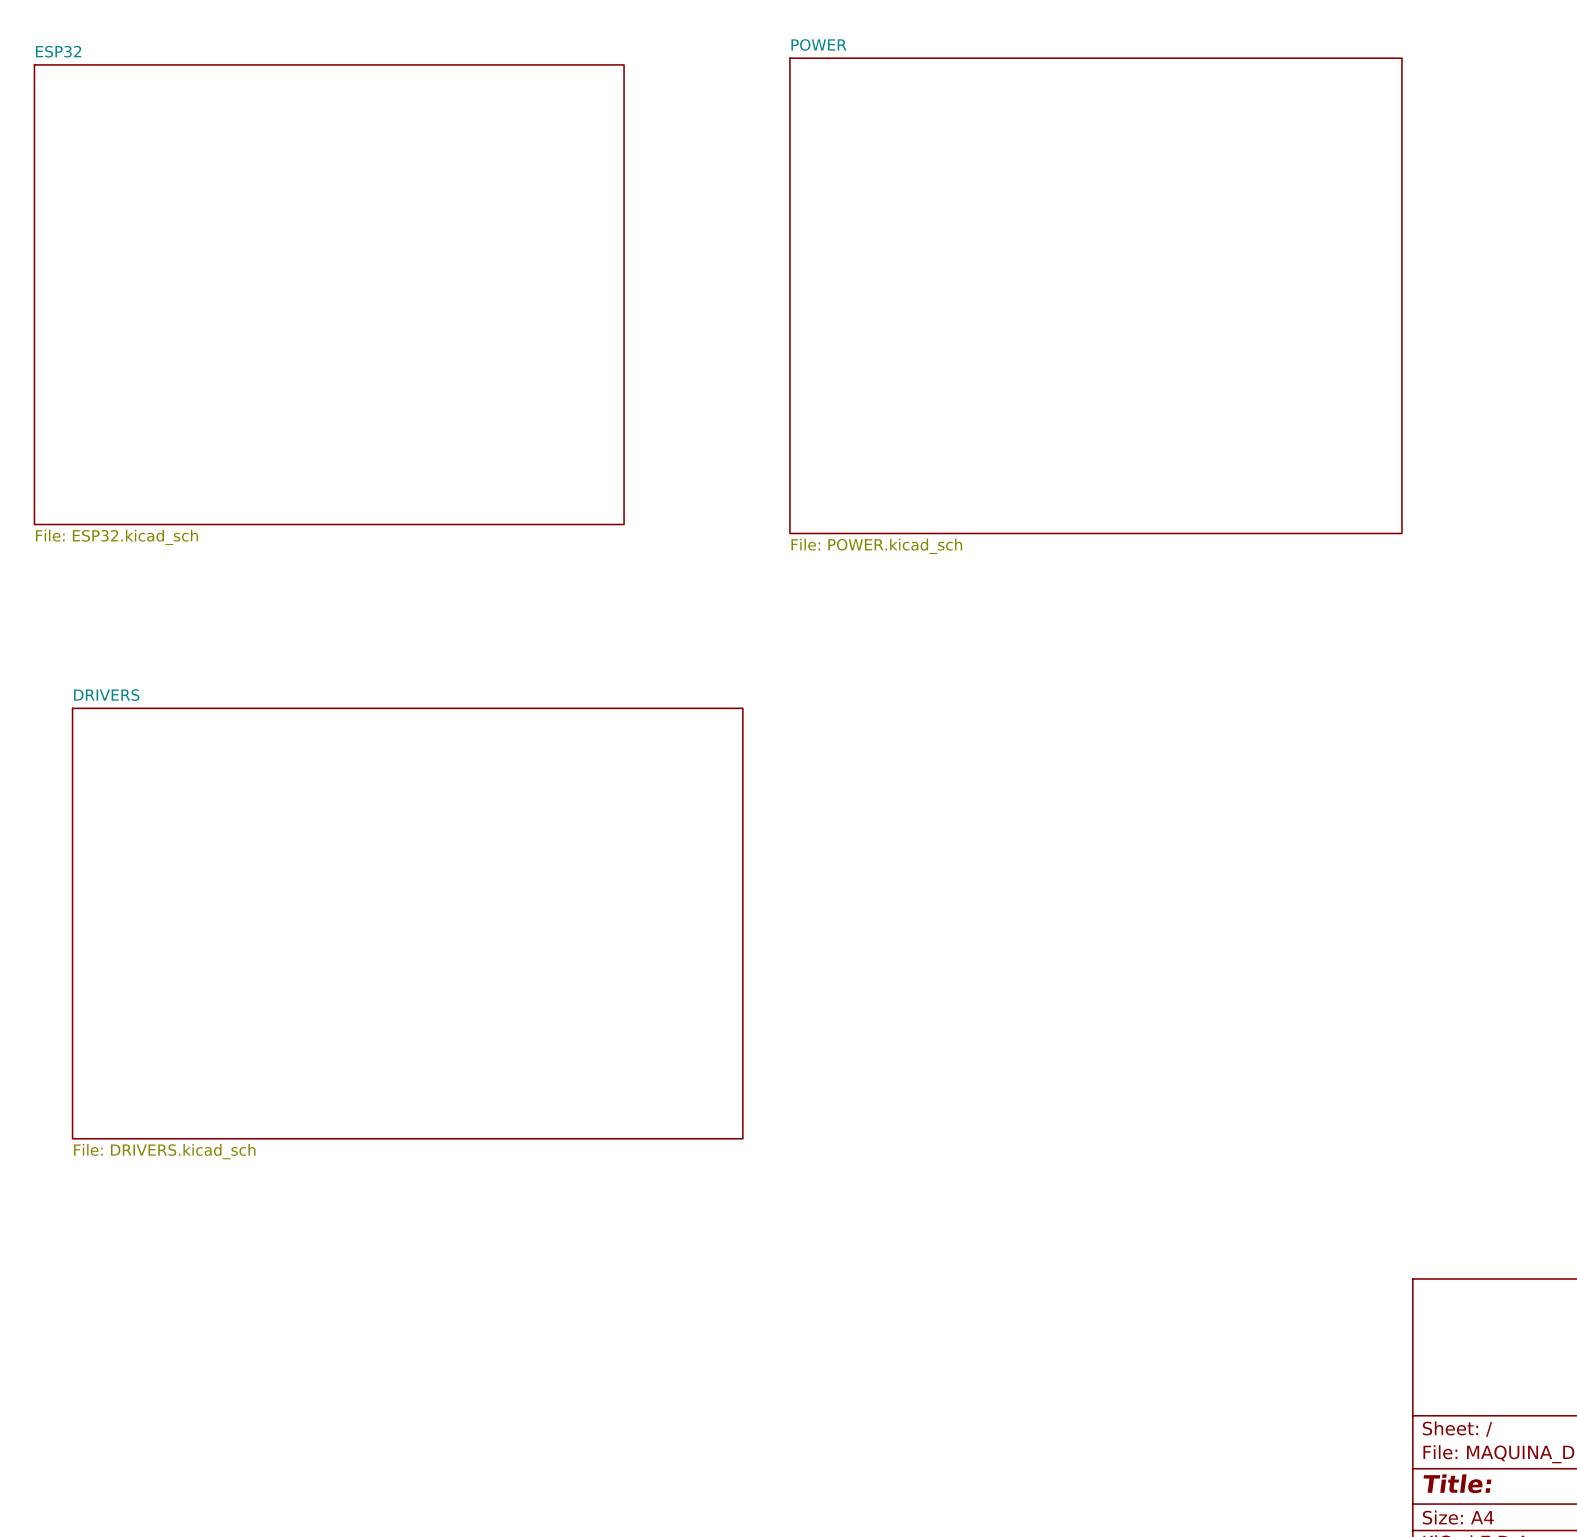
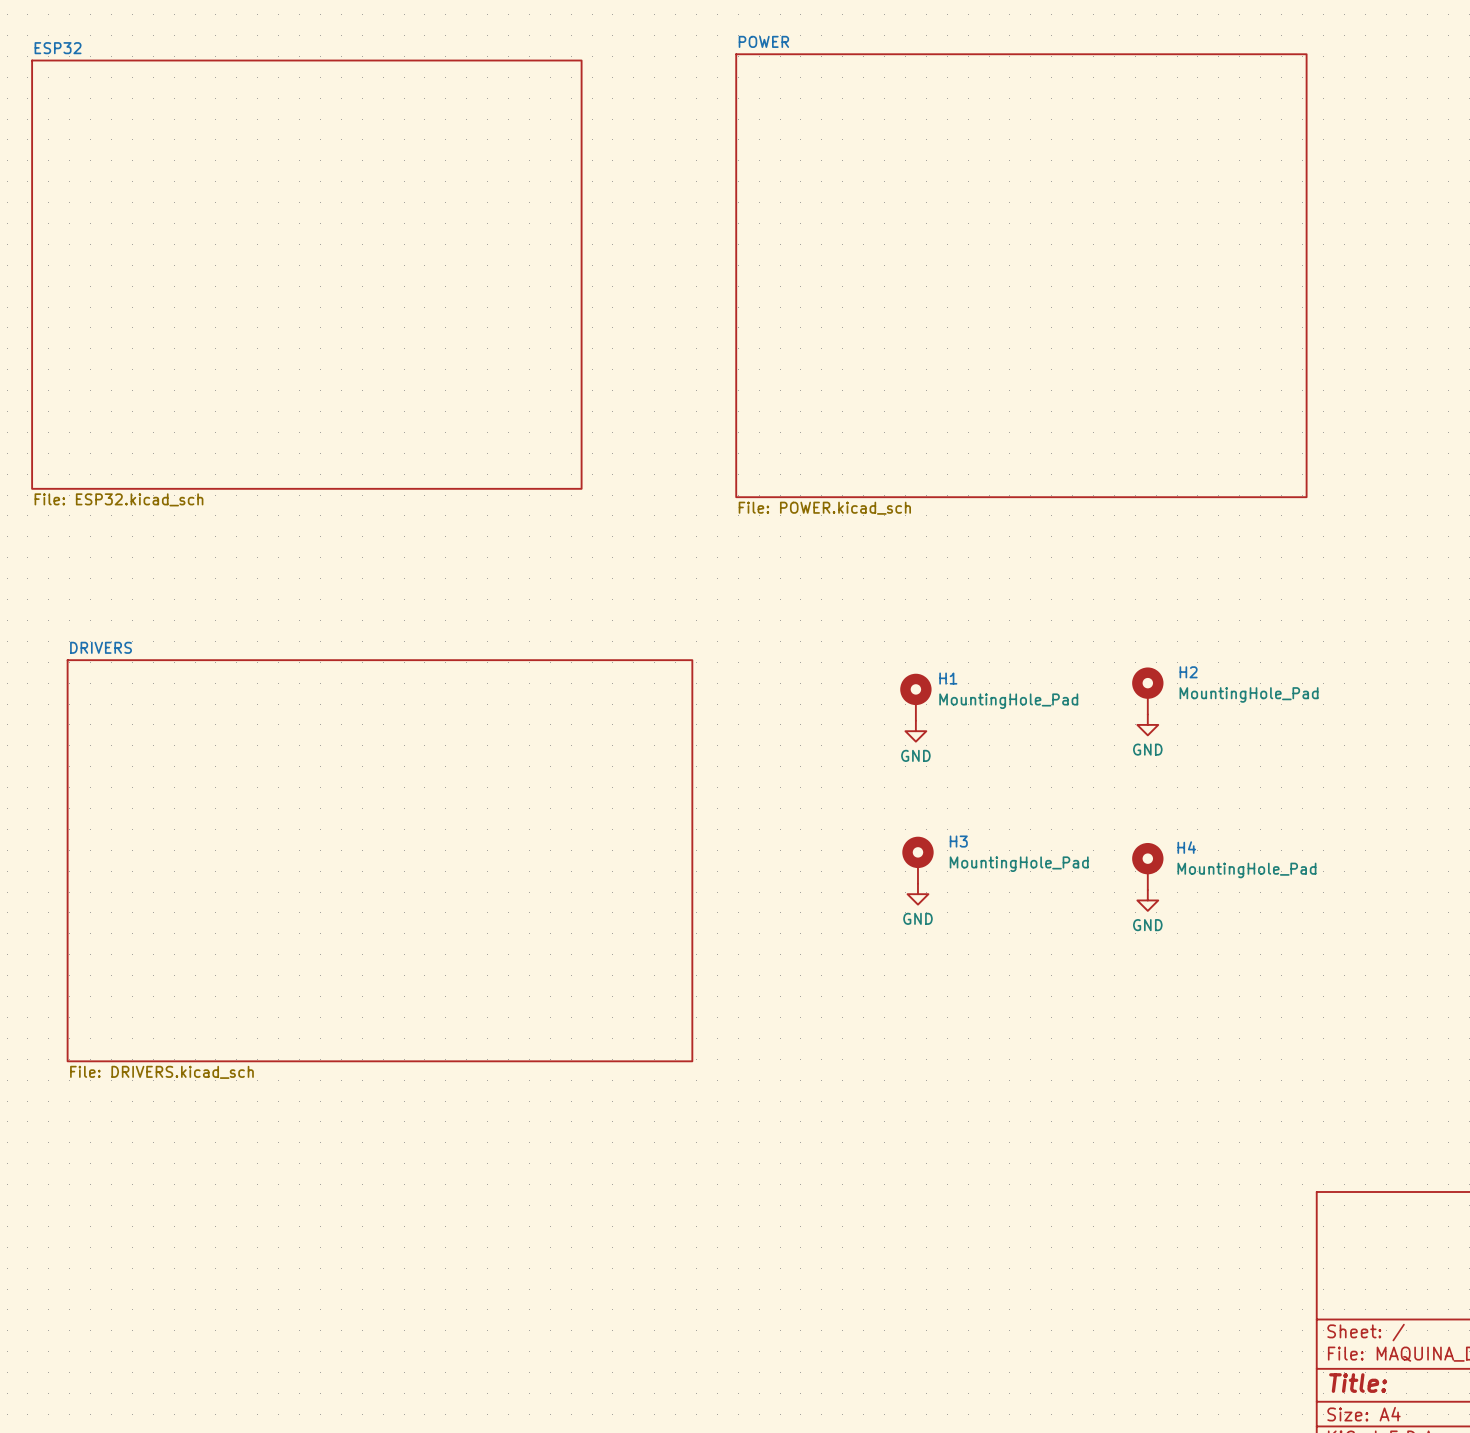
H2: none -> MountingHole_Pad (1147, 690)
H1: none -> MountingHole_Pad (915, 697)
power symbol: none -> GND (1147, 724)
power symbol: none -> GND (915, 731)
H3: none -> MountingHole_Pad (917, 860)
H4: none -> MountingHole_Pad (1147, 866)
power symbol: none -> GND (917, 894)
power symbol: none -> GND (1147, 900)

